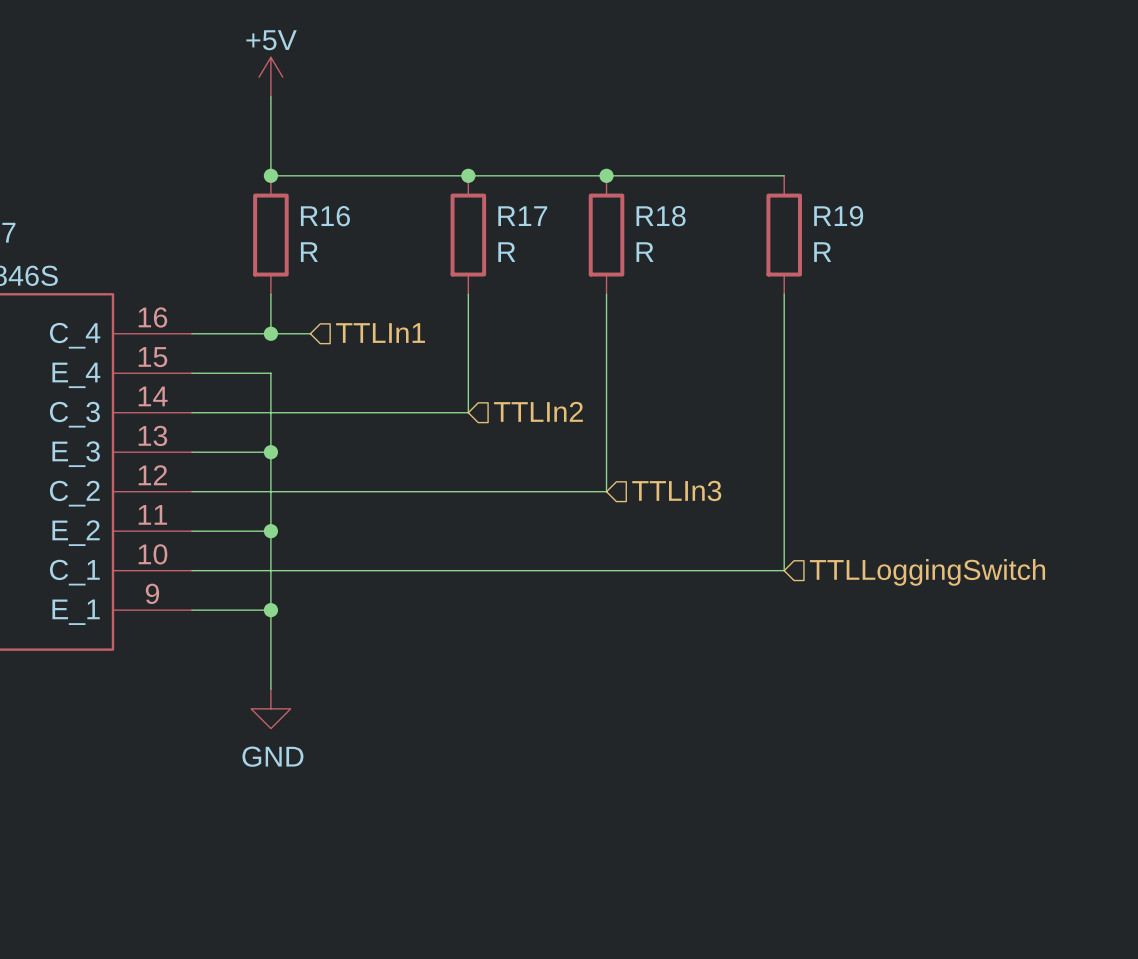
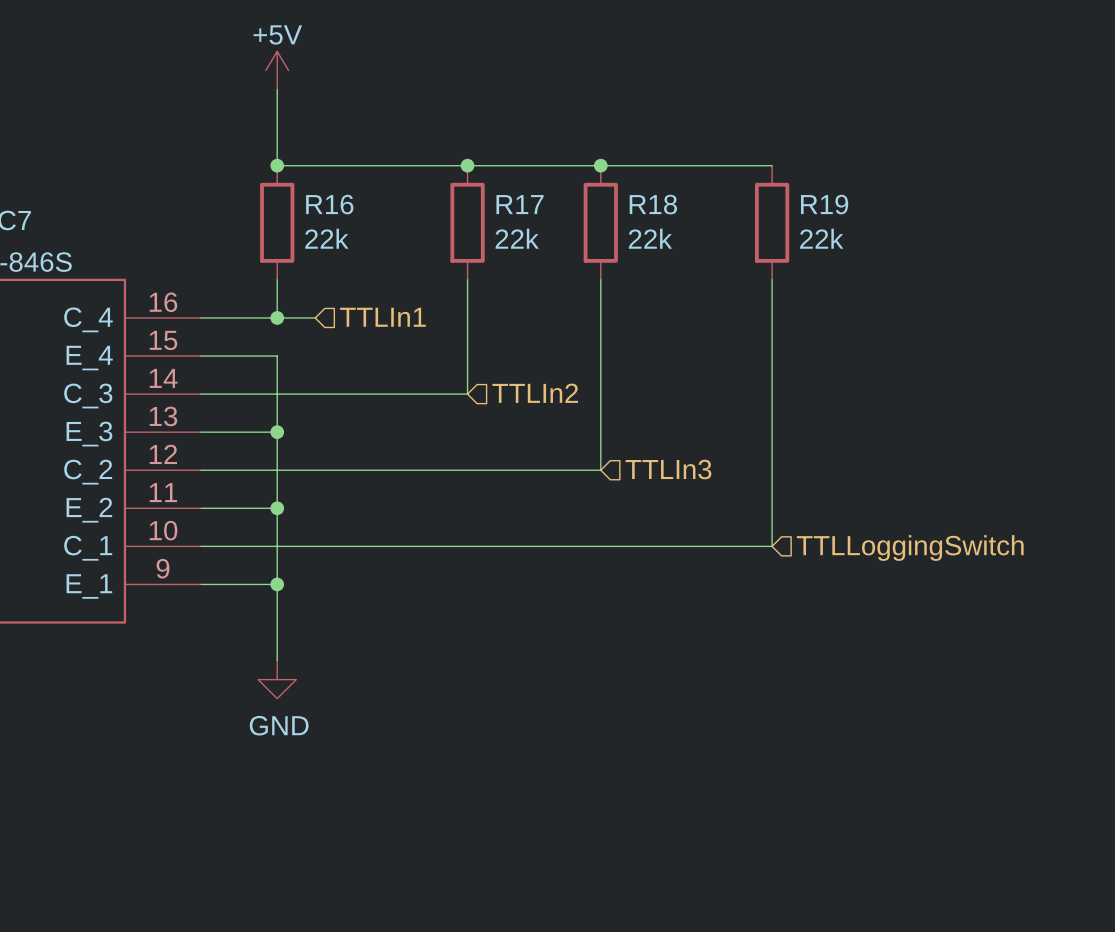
R16 value: R (309, 252) -> 22k (326, 238)
R17 value: R (506, 252) -> 22k (517, 238)
R18 value: R (645, 252) -> 22k (650, 238)
R19 value: R (822, 252) -> 22k (821, 238)

